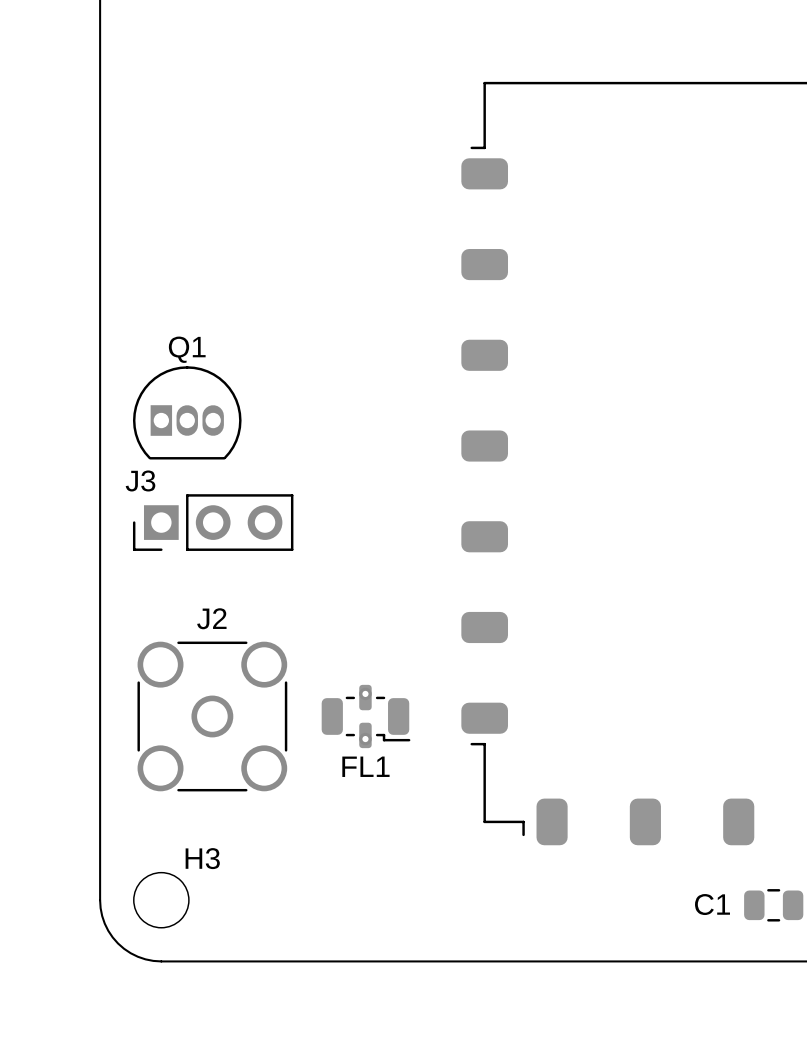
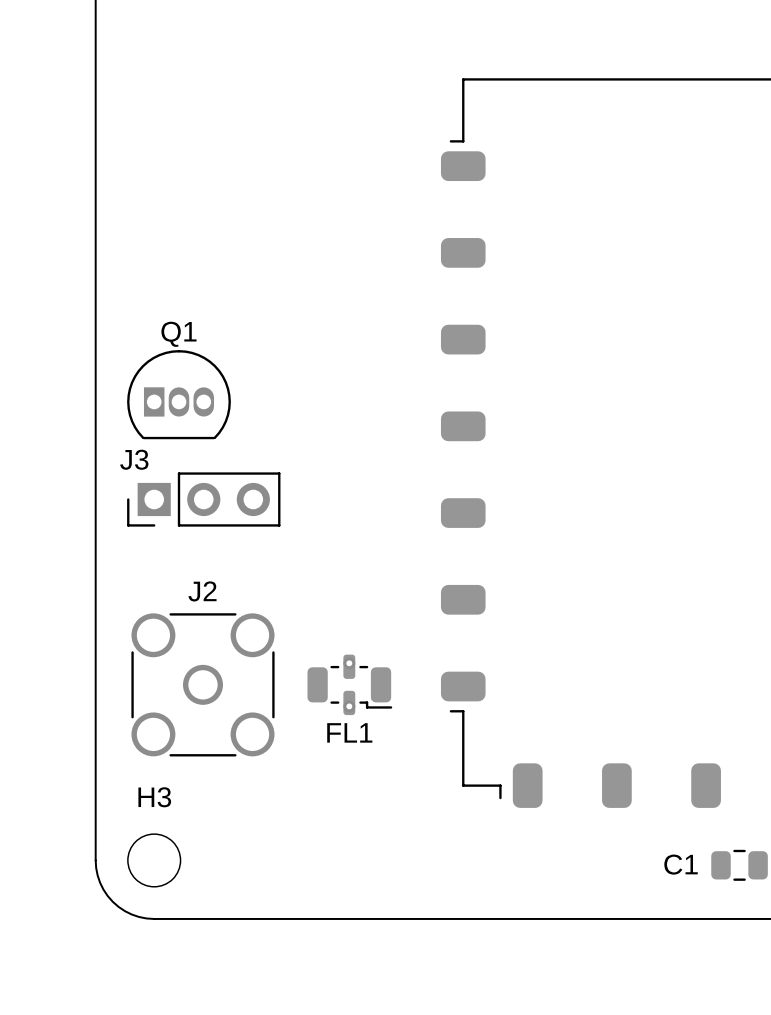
H3 name position: H3 (202, 858) -> H3 (154, 797)

